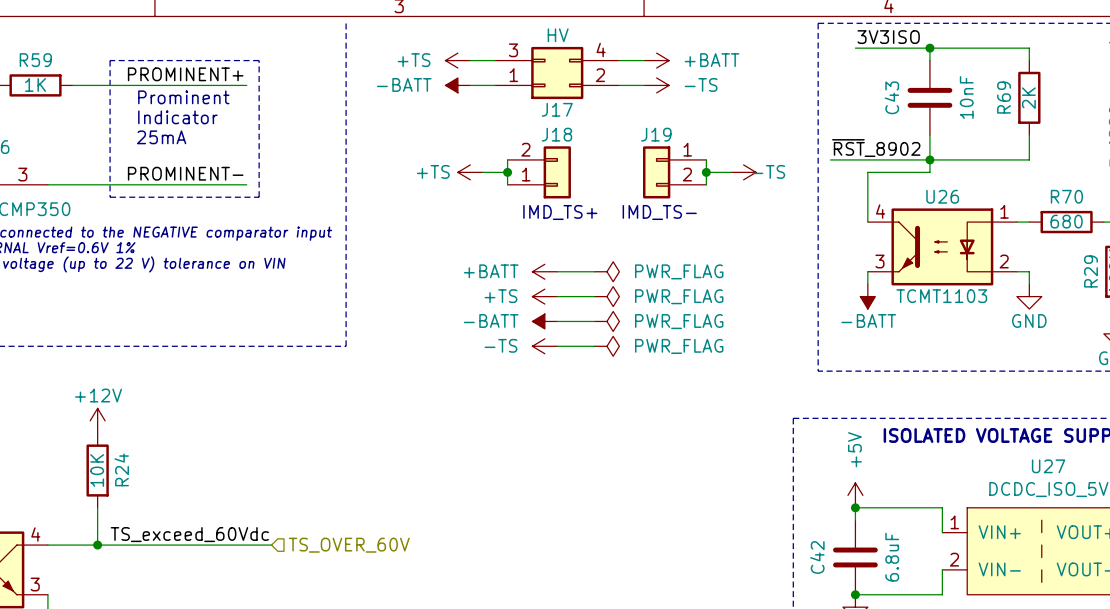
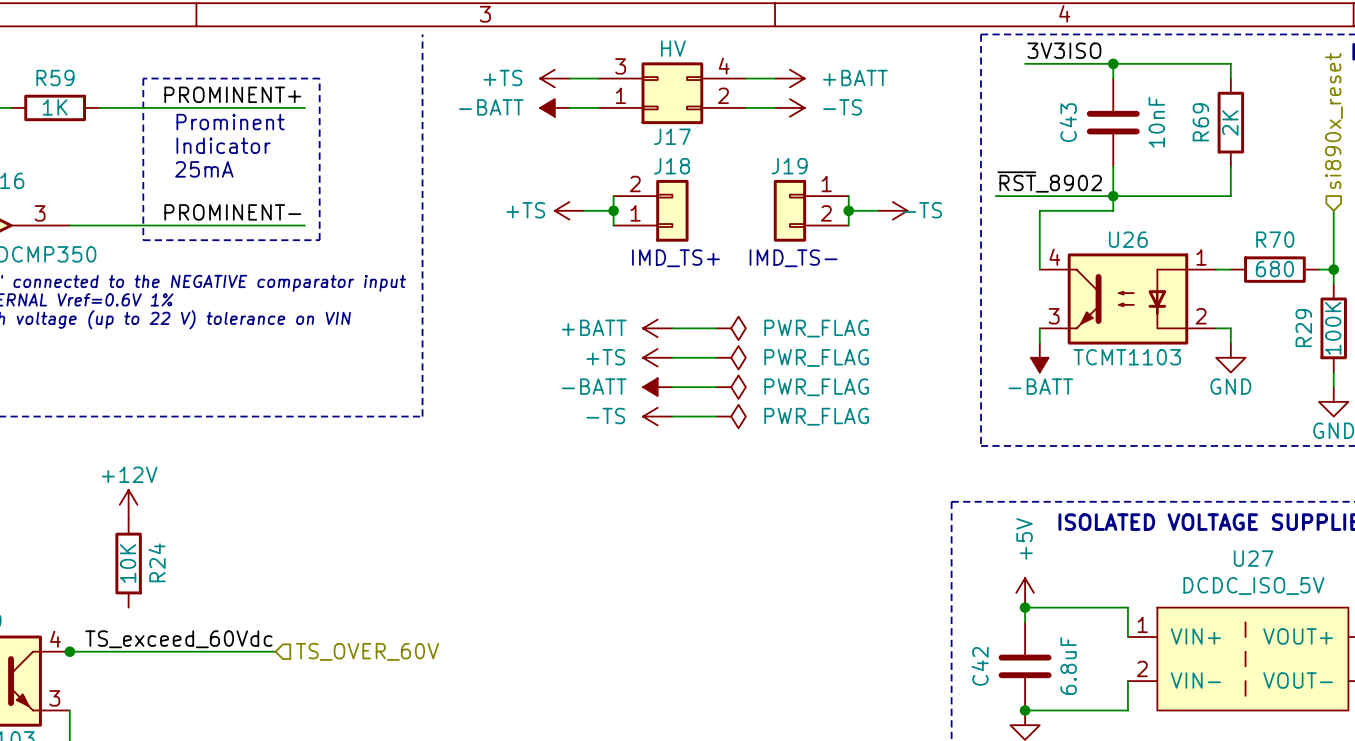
wire: (97, 507) (97, 545) -> none
label position: TS_exceed_60Vdc (189, 534) -> TS_exceed_60Vdc (178, 639)
junction position: (97, 545) -> (69, 651)
wire: (221, 545) (271, 545) -> none
hierarchical label position: TS_OVER_60V (349, 545) -> TS_OVER_60V (367, 651)

